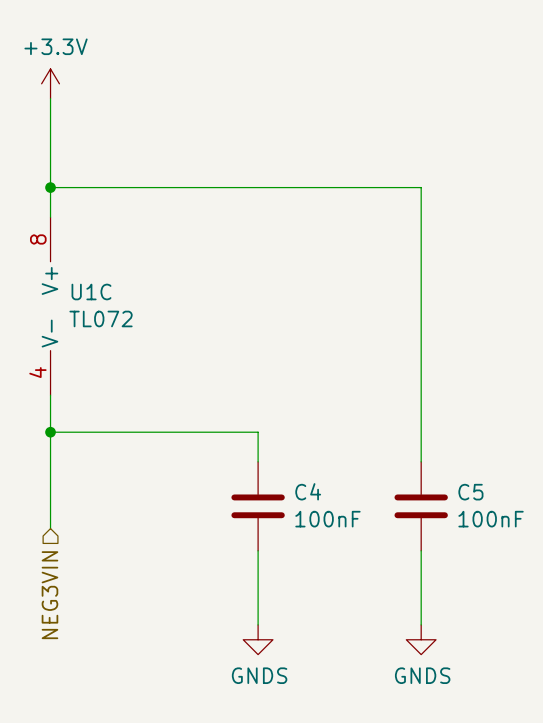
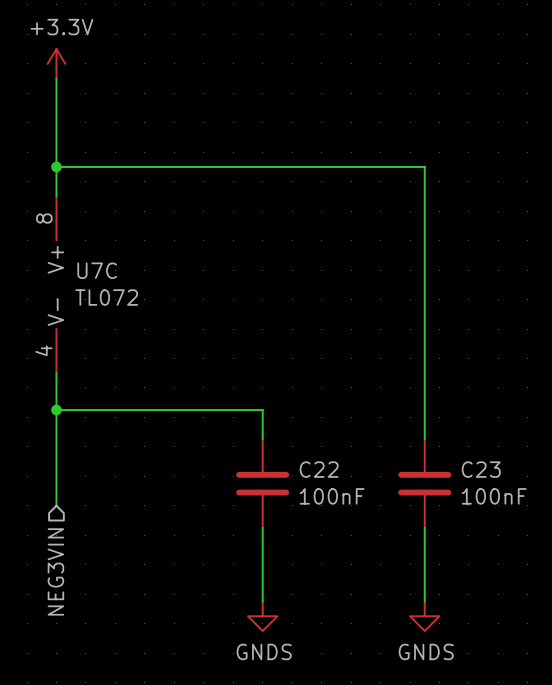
U1C name: U1C (91, 291) -> U7C (97, 270)
C4 name: C4 (308, 491) -> C22 (319, 469)
C5 name: C5 (470, 492) -> C23 (481, 469)

